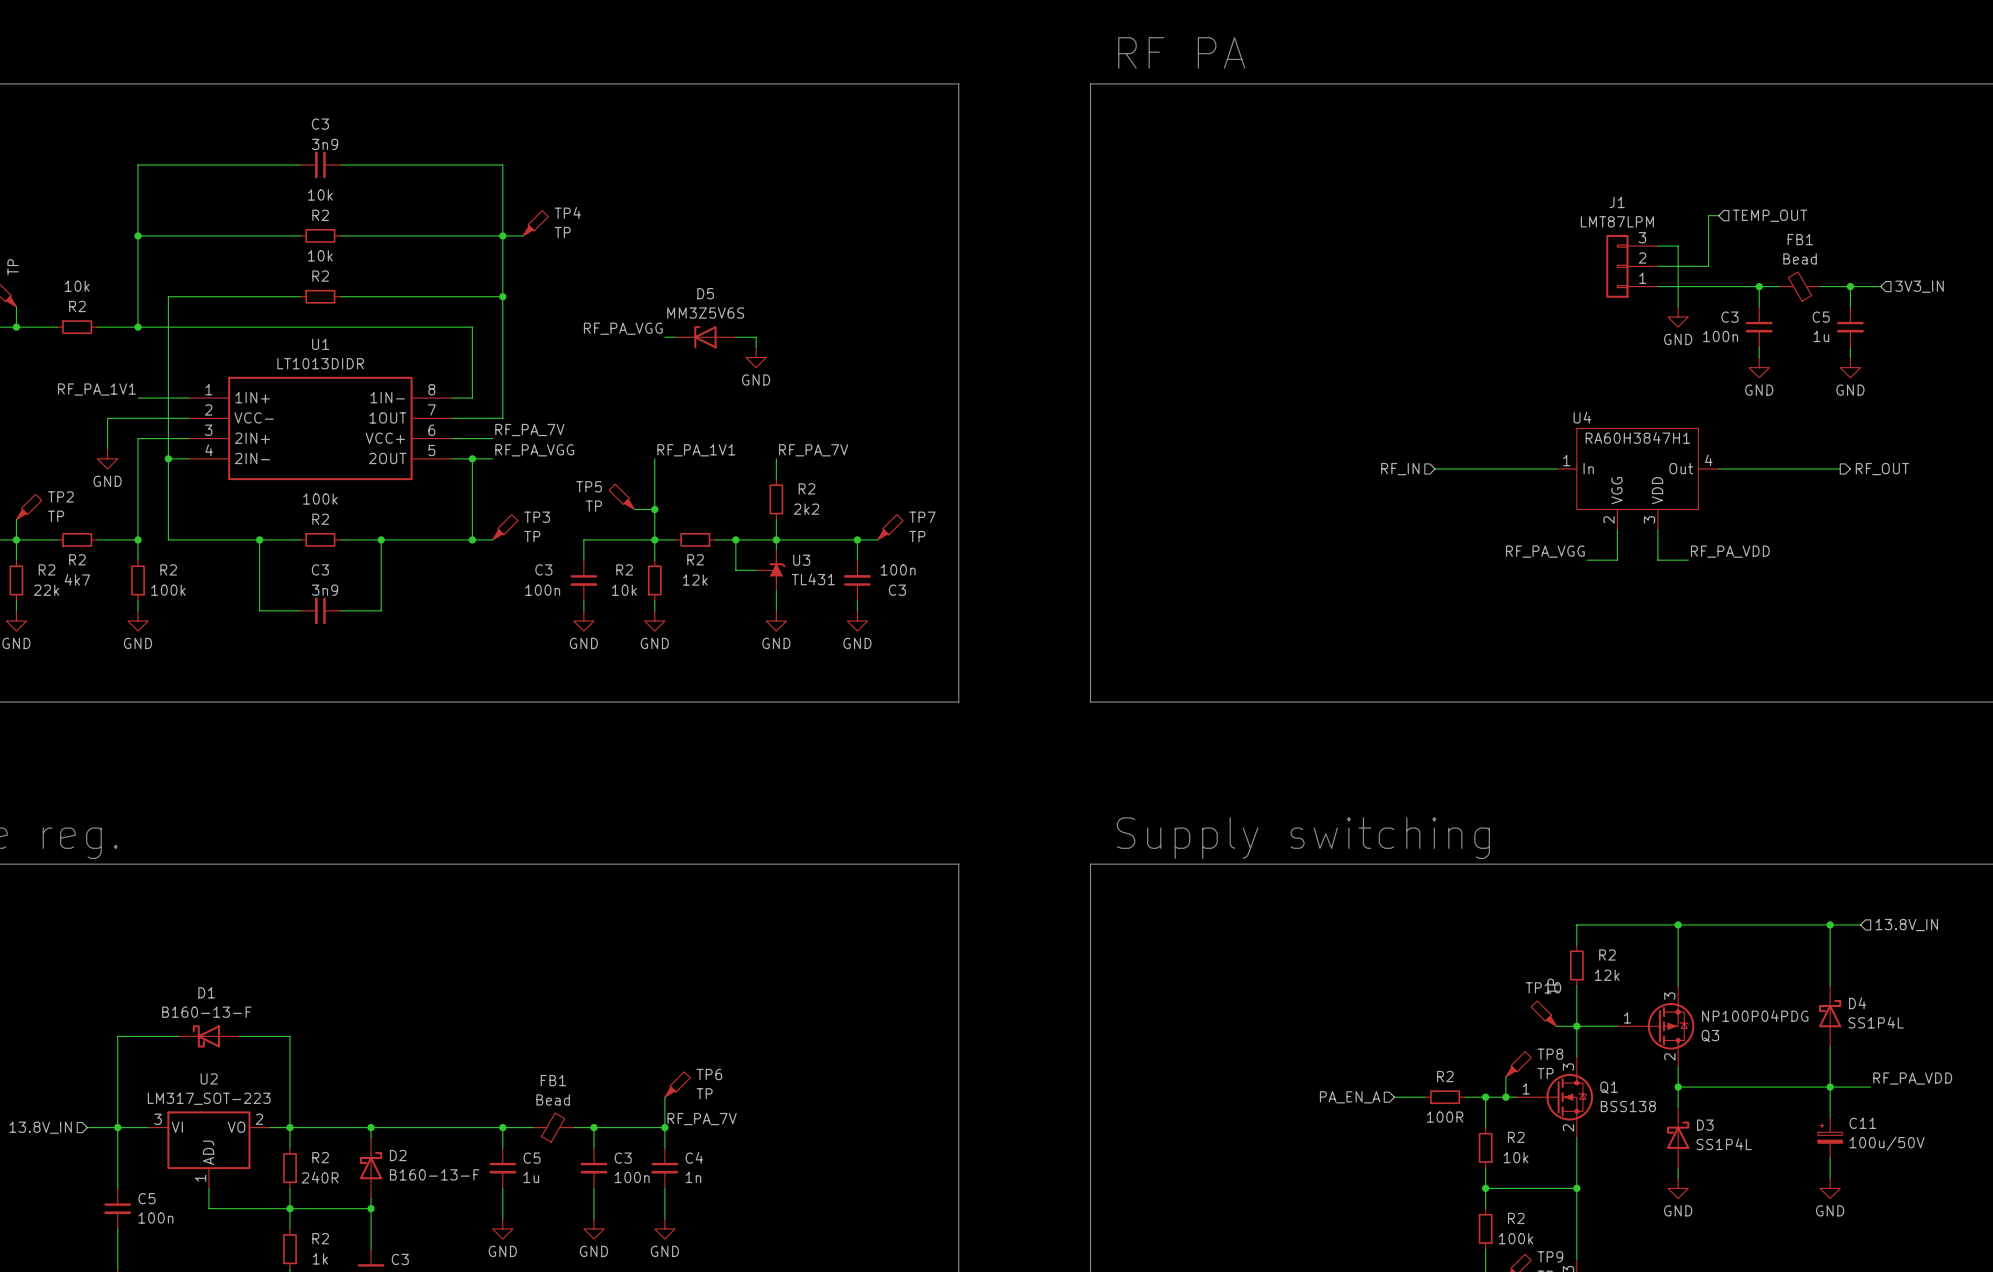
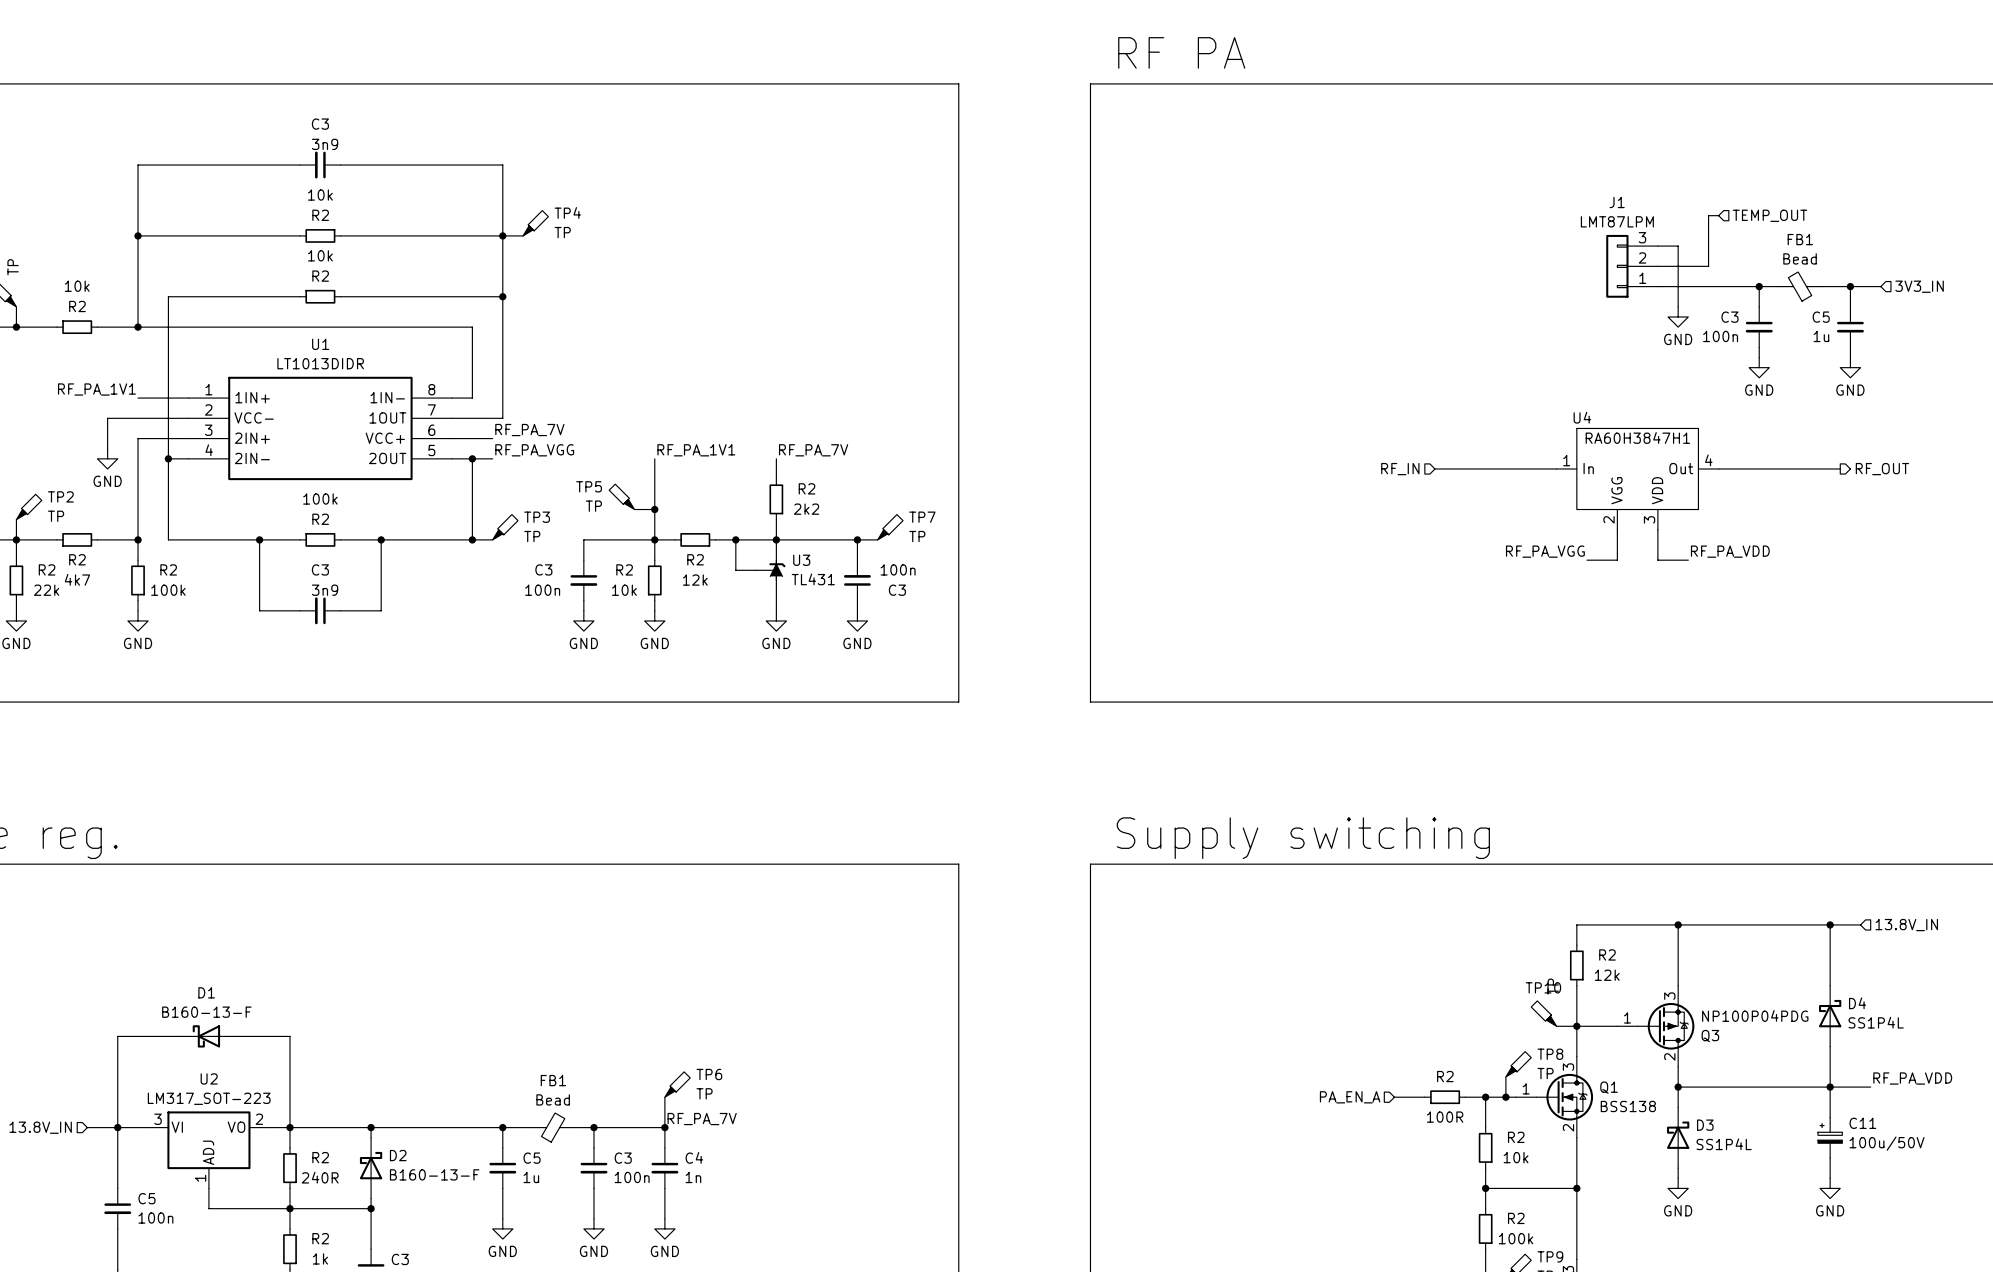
label: RF_PA_VGG (623, 328) -> none
wire: (664, 337) (675, 337) -> none
D5: MM3Z5V6S (705, 337) -> none
wire: (735, 337) (756, 337) (756, 347) -> none
power symbol: GND (756, 357) -> none

